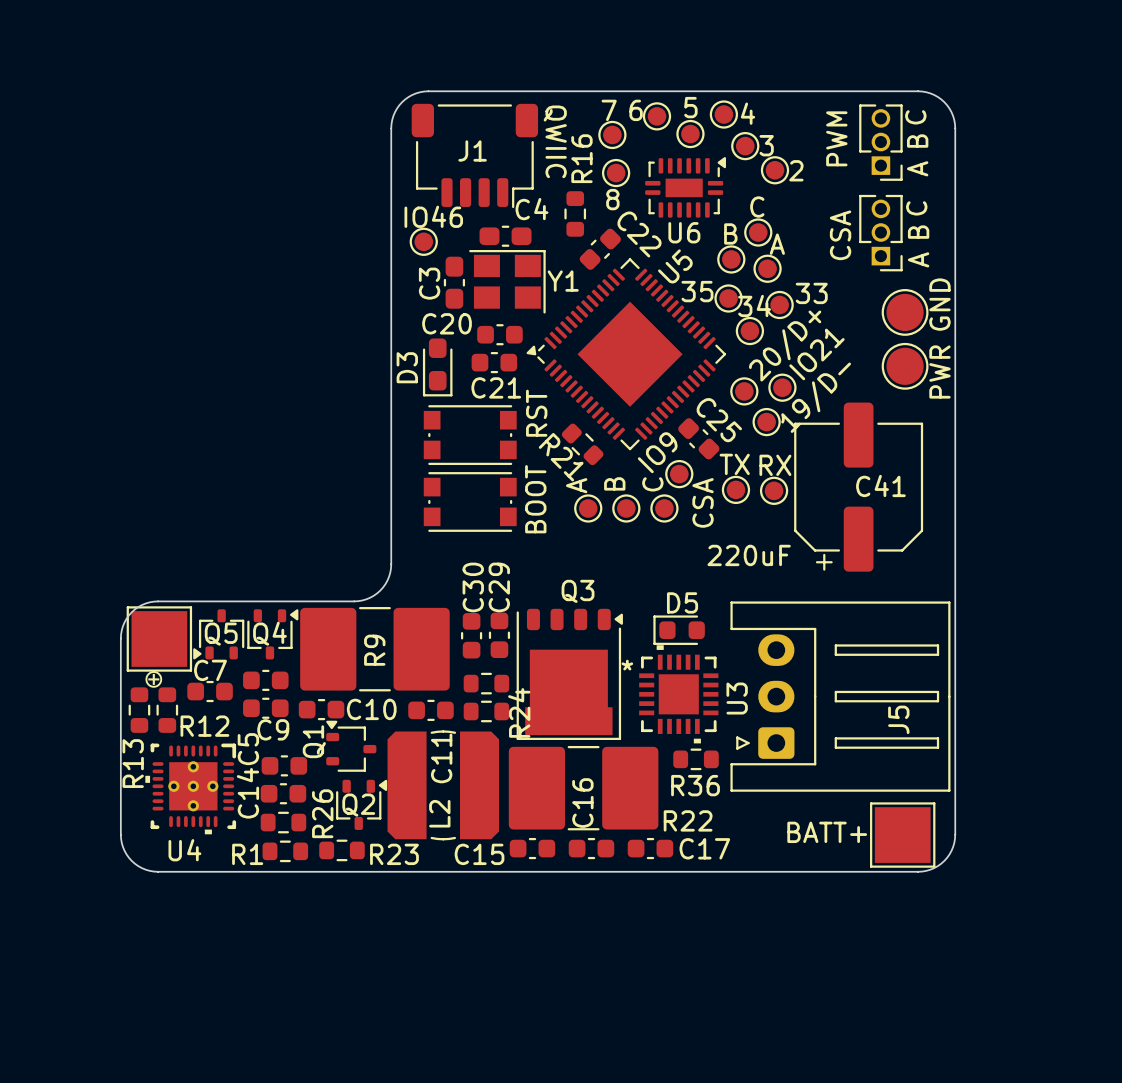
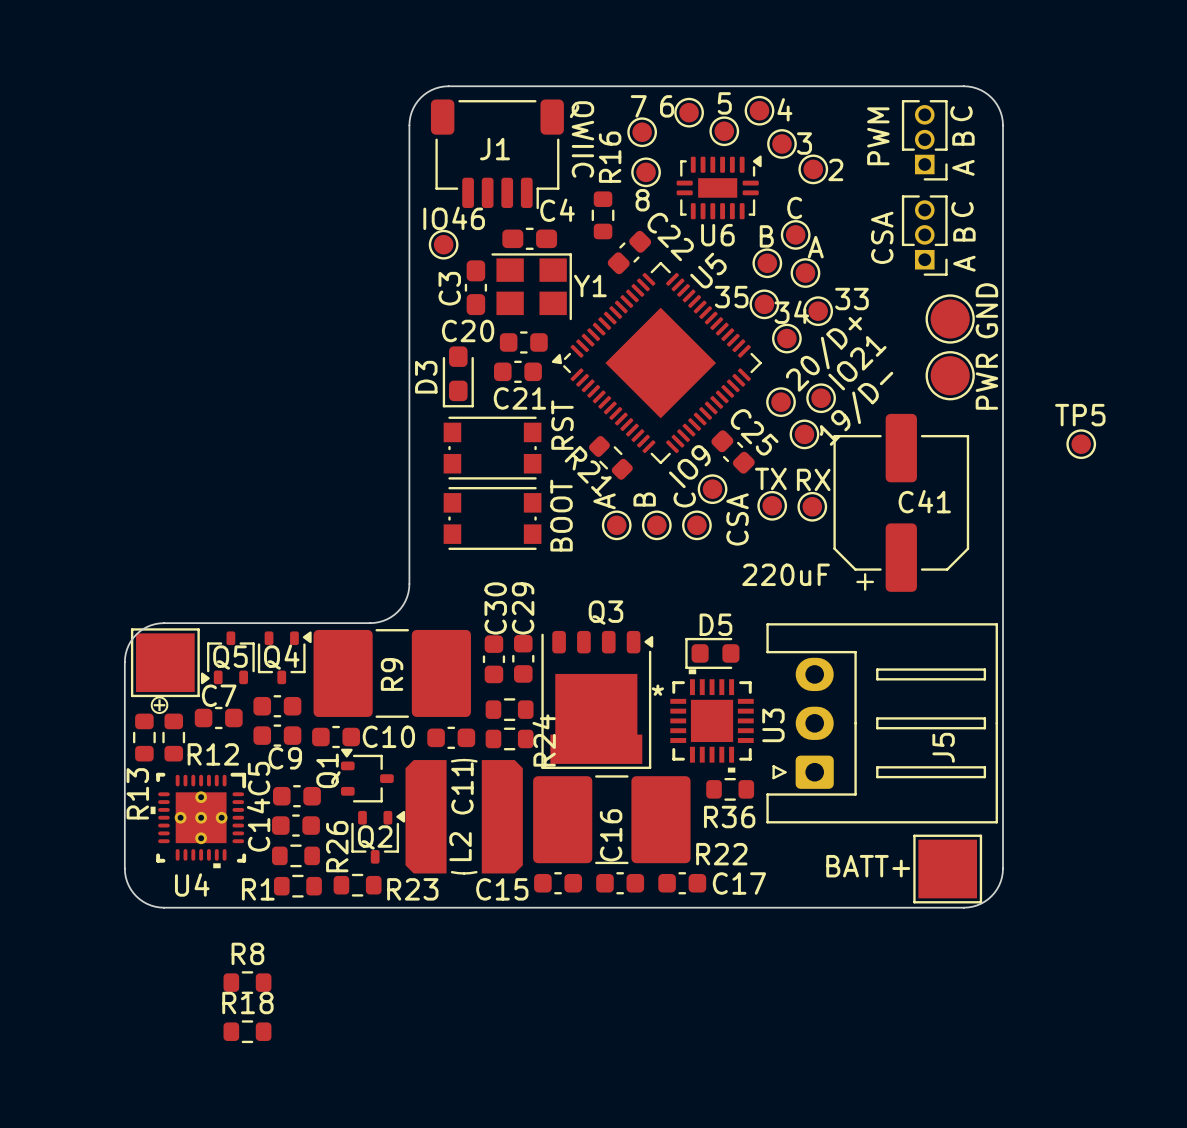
TP5: none -> (1081, 444)
R8: none -> (247, 982)
R18: none -> (247, 1031)

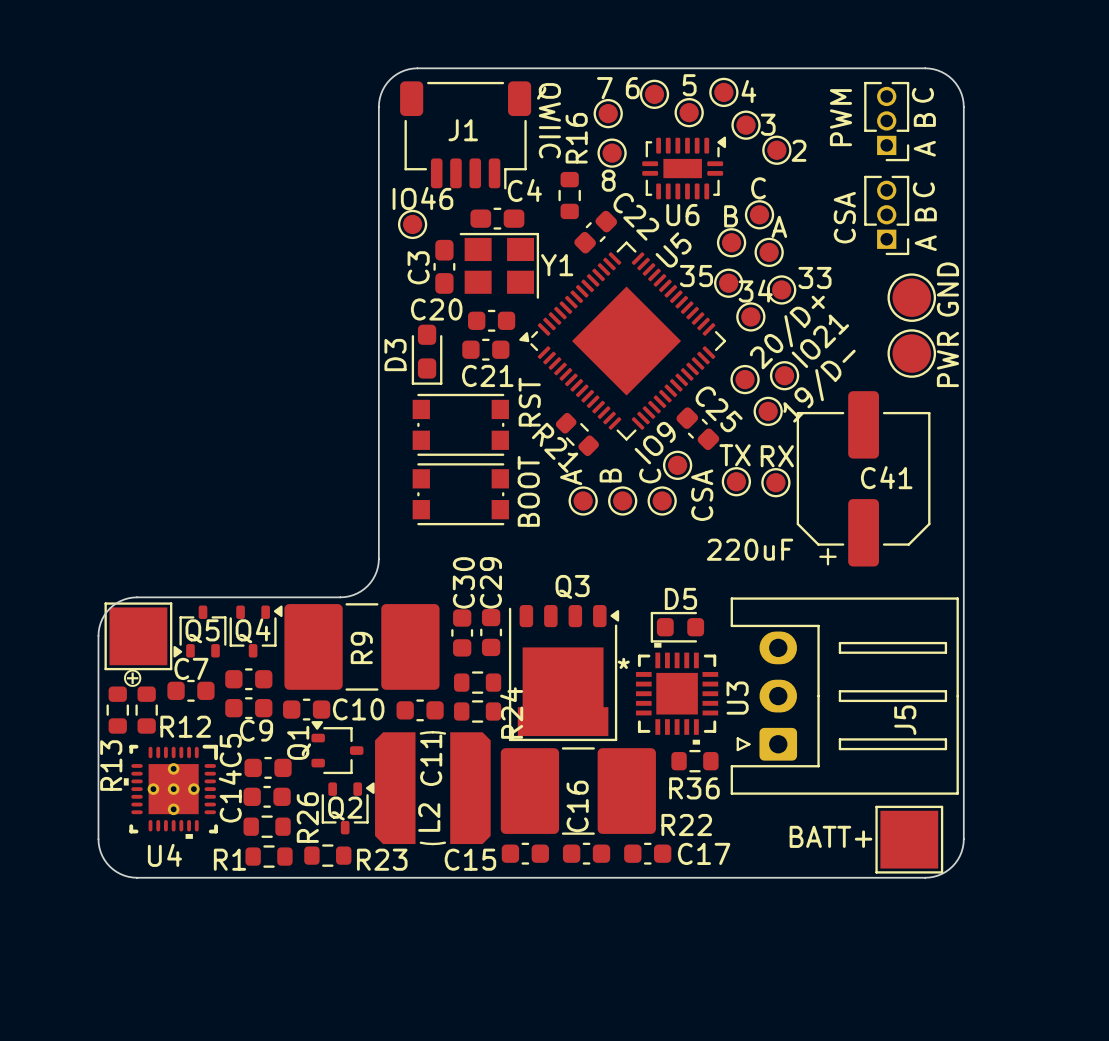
TP5: (1081, 444) -> none
R8: (247, 982) -> none
R18: (247, 1031) -> none

